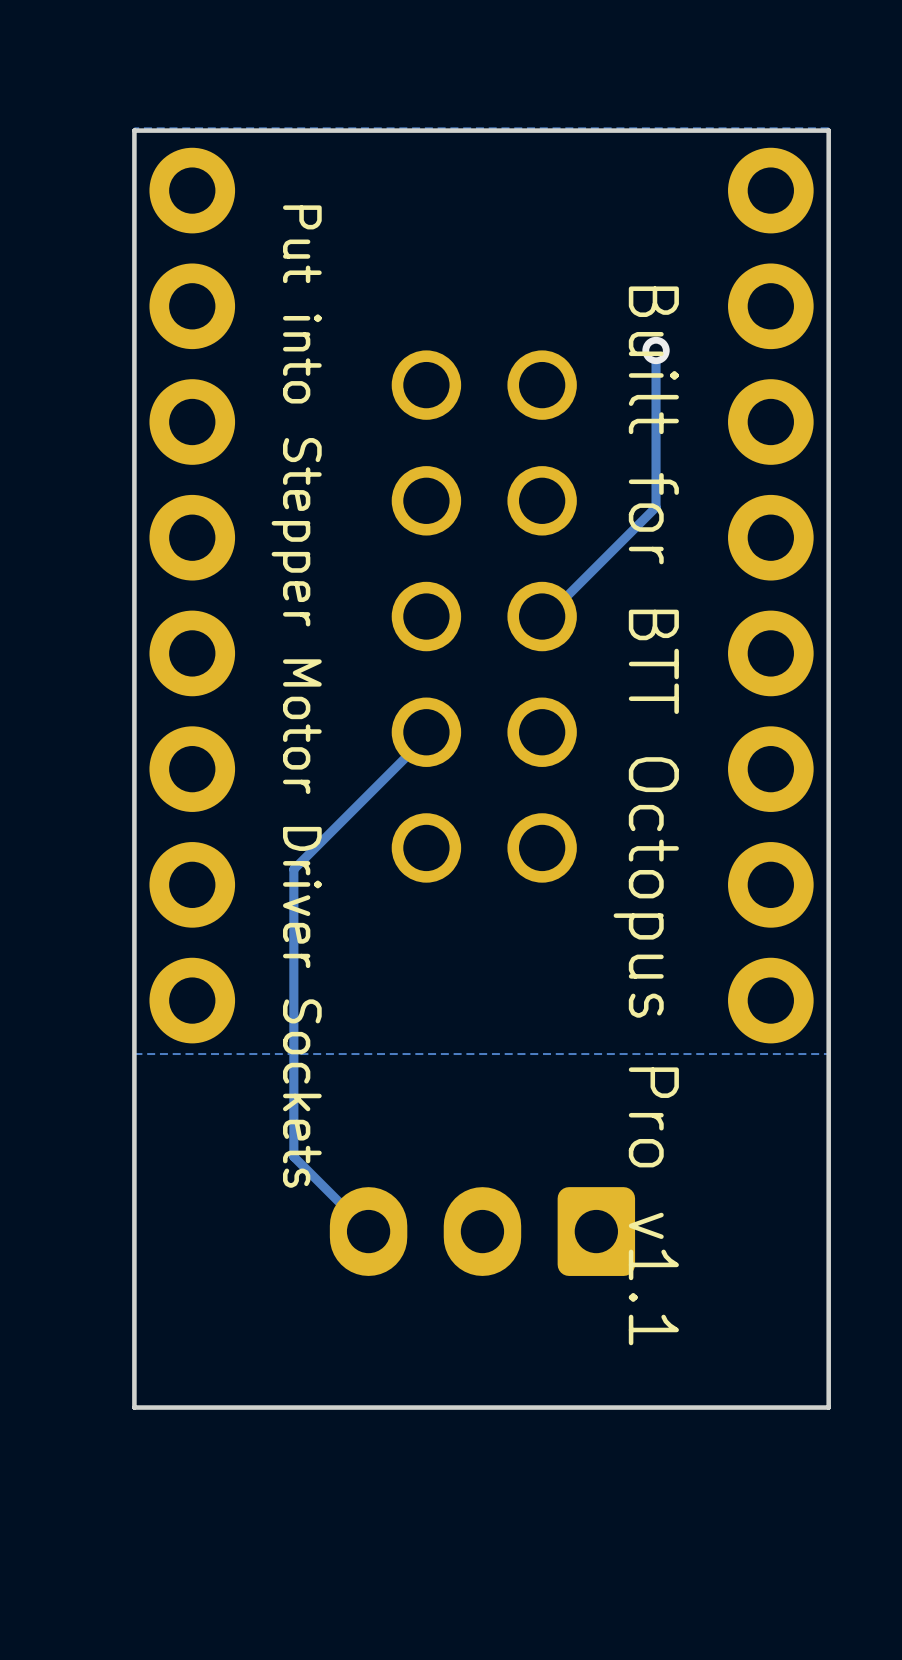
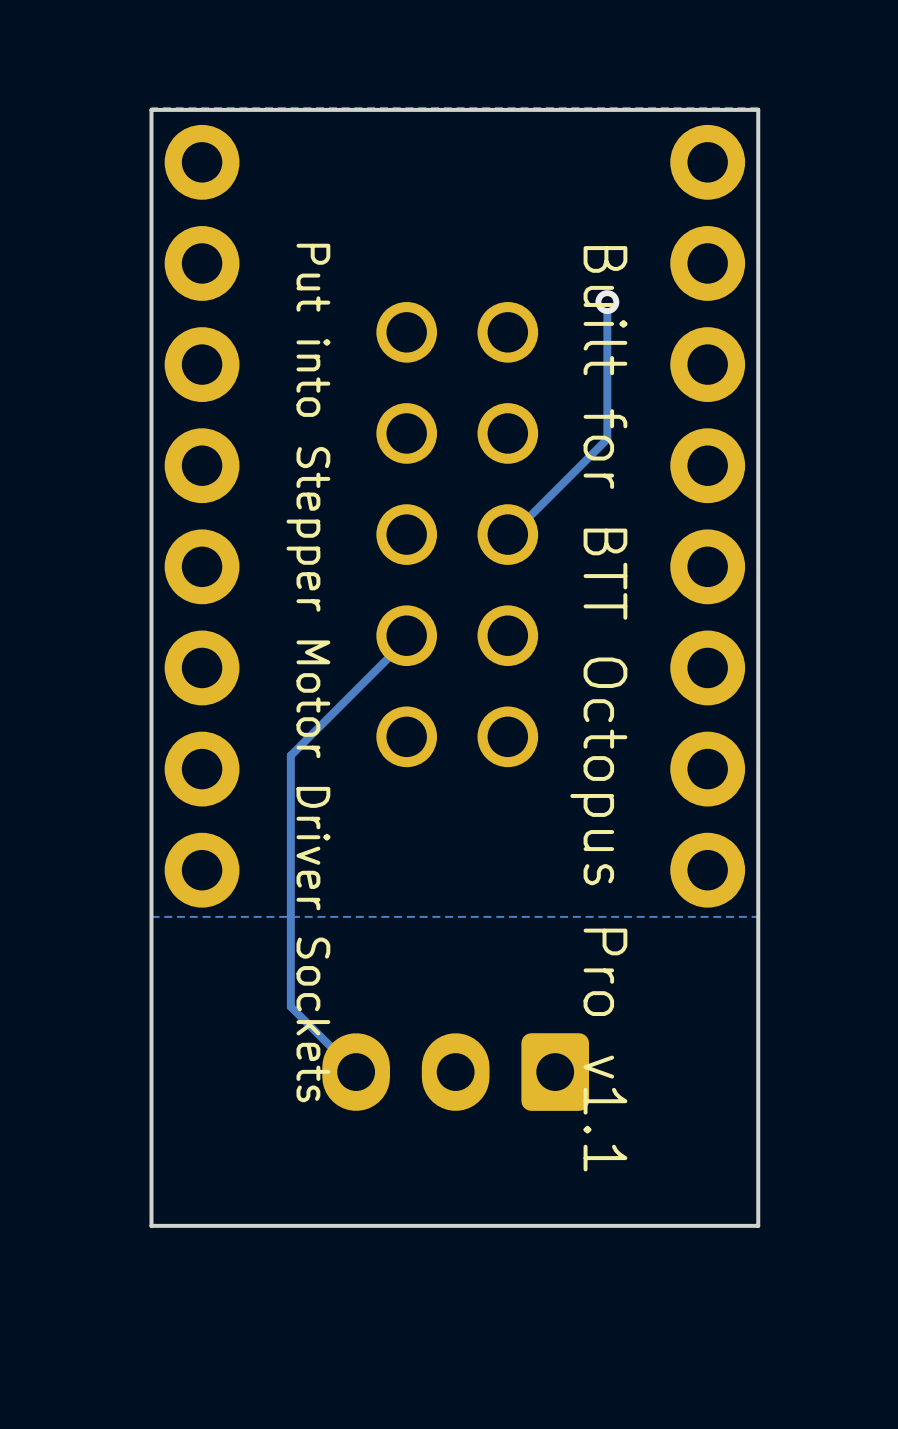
text position: Put into Stepper Motor Driver Sockets (296, 696) -> Put into Stepper Motor Driver Sockets (308, 672)

